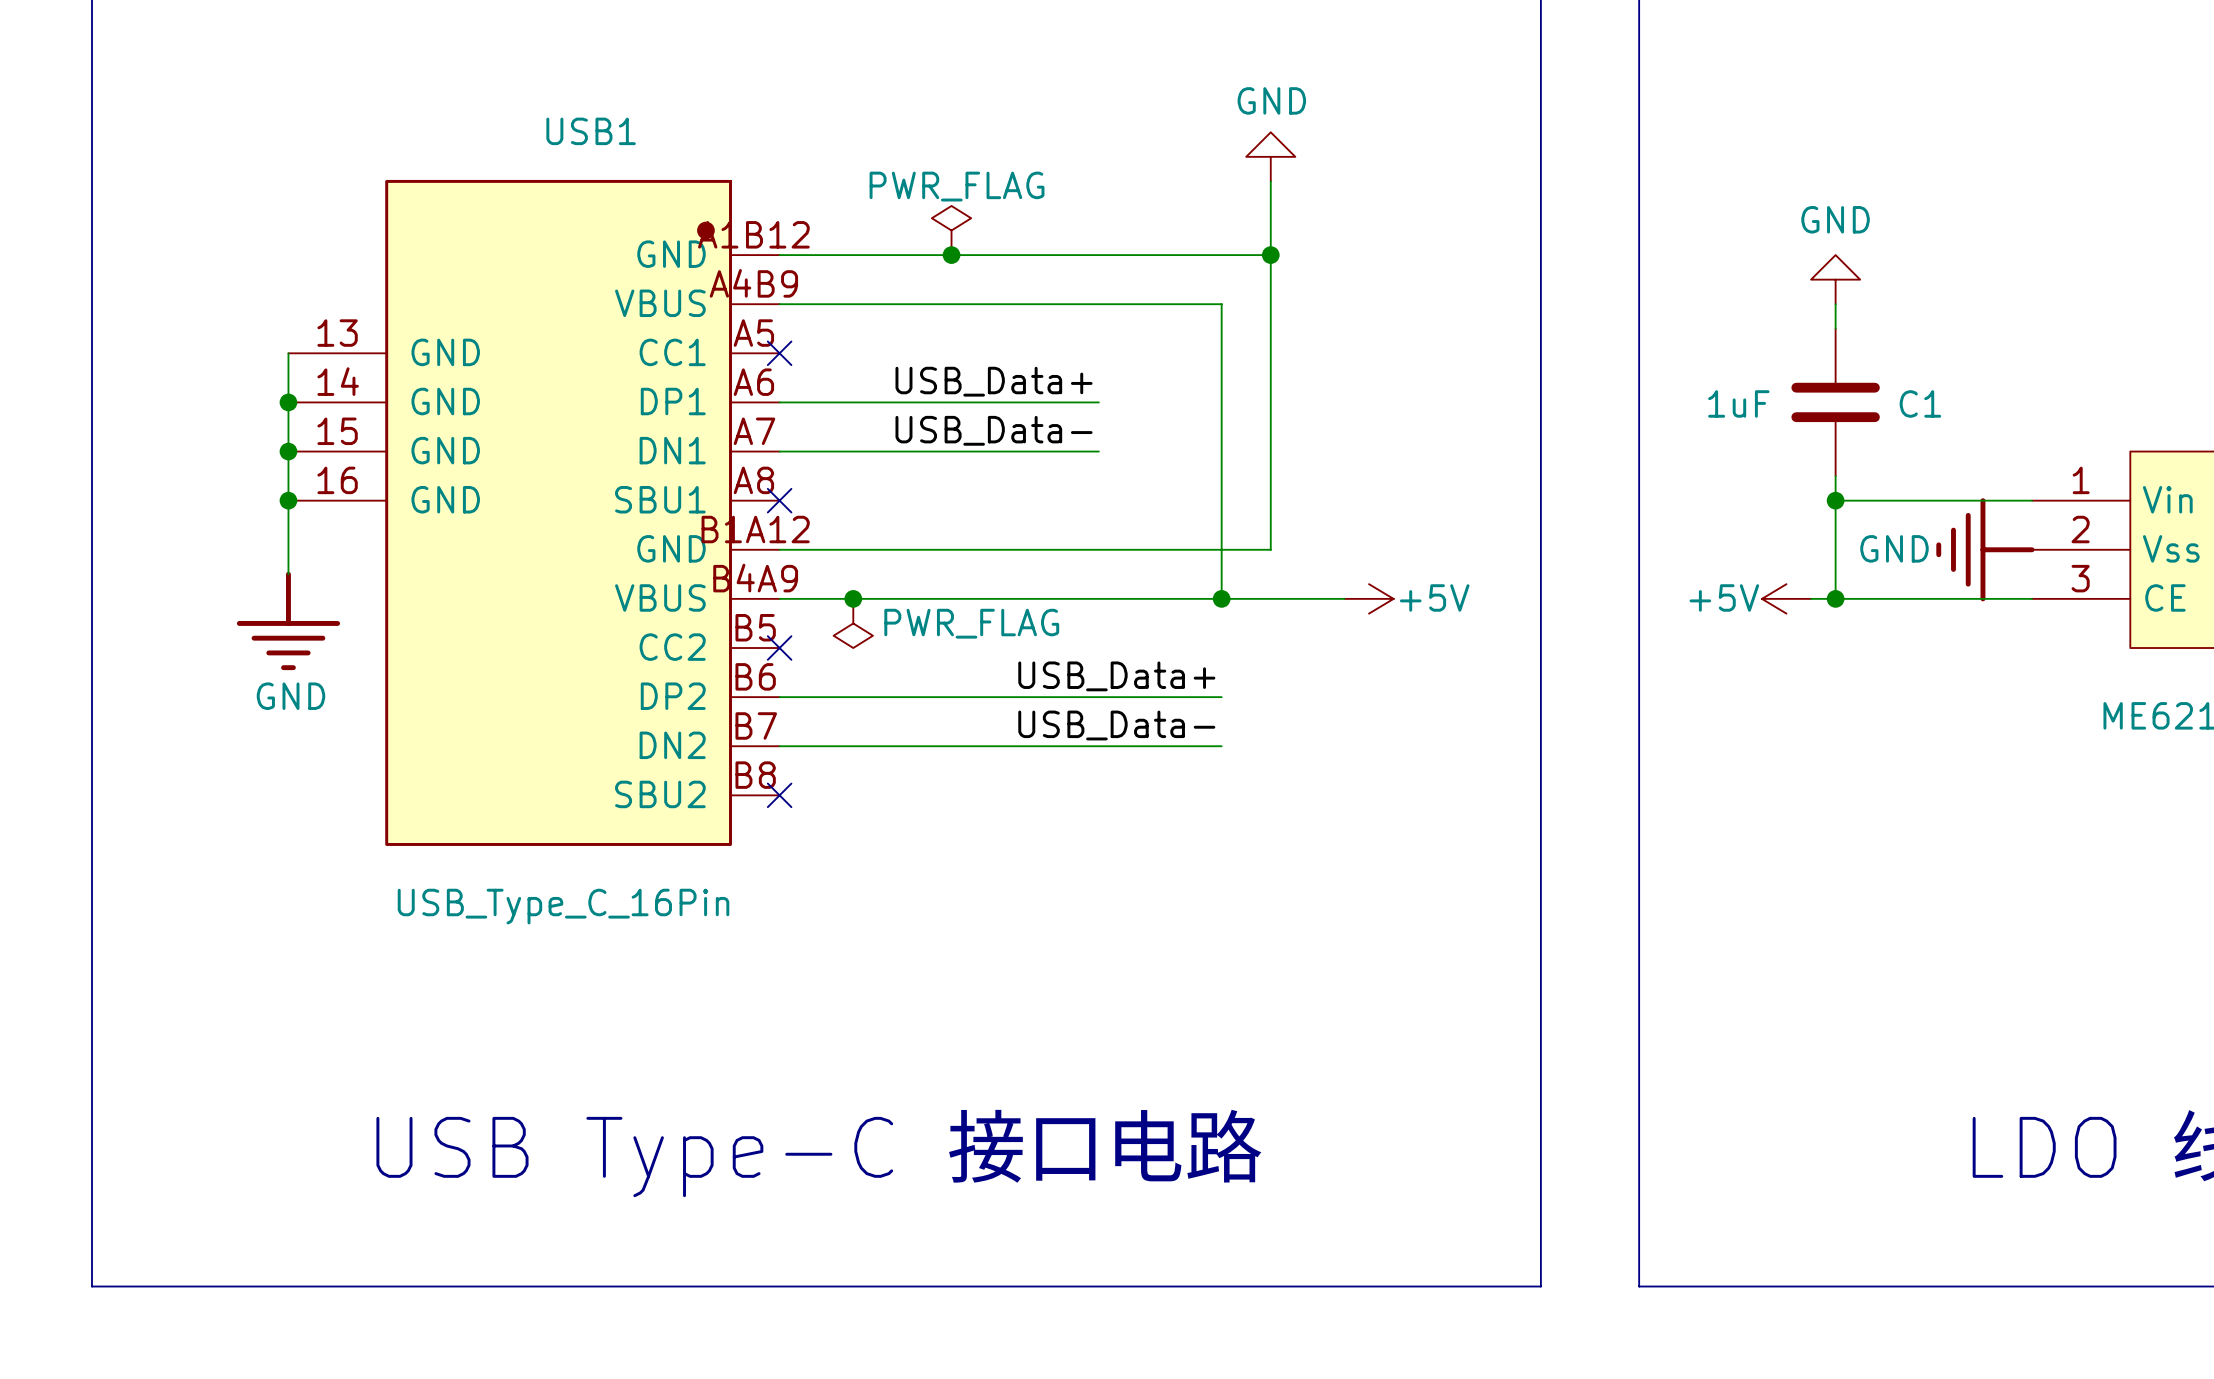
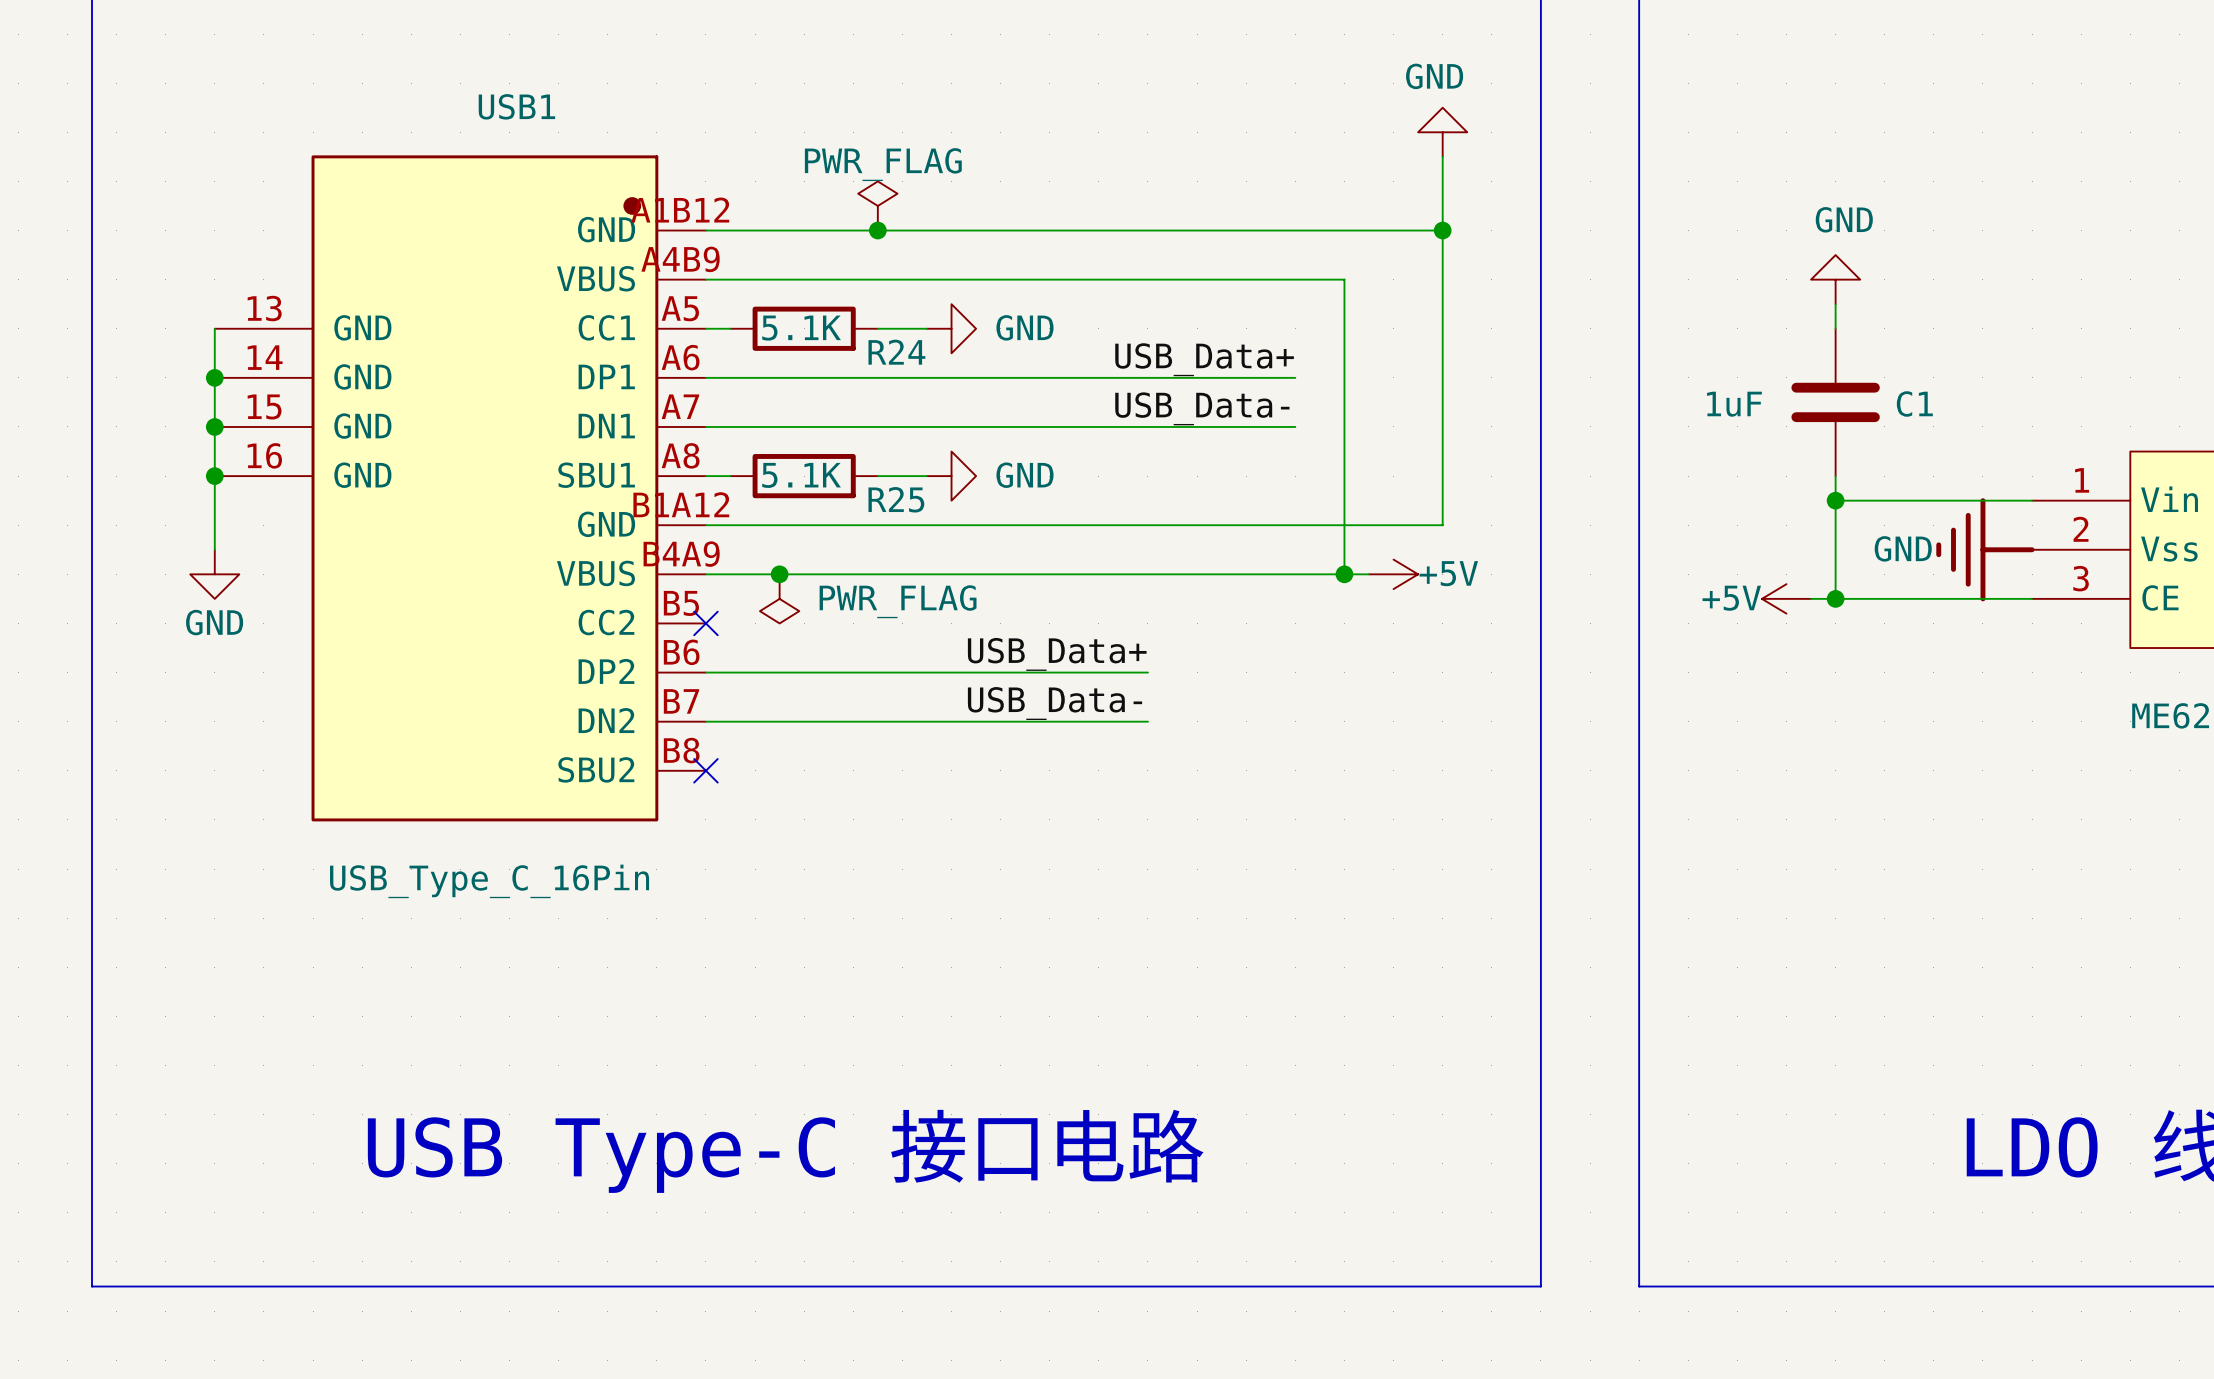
power symbol position: GND (1270, 156) -> GND (1442, 132)
wire: none -> (1442, 156) (1442, 525) (705, 525)
wire: (1270, 181) (1270, 549) (779, 549) -> none
wire: none -> (705, 230) (1442, 230)
power symbol position: PWR_FLAG (951, 230) -> PWR_FLAG (877, 205)
junction: none -> (1442, 230)
wire: (779, 255) (1270, 255) -> none
junction position: (951, 255) -> (877, 230)
junction: (1270, 255) -> none
wire: none -> (705, 279) (1344, 279) (1344, 574)
wire: (779, 304) (1221, 304) (1221, 598) -> none
R24: none -> 5.1K (804, 328)
wire: none -> (877, 328) (926, 328)
power symbol: none -> GND (951, 328)
wire: (288, 353) (288, 574) -> (214, 328) (214, 549)
no-connect mark: (779, 353) -> none
label: none -> USB_Data+ (1204, 359)
junction: none -> (214, 377)
wire: none -> (705, 377) (1295, 377)
label: USB_Data+ (994, 381) -> none
junction: (288, 402) -> none
wire: (779, 402) (1098, 402) -> none
label: none -> USB_Data- (1202, 408)
junction: none -> (214, 426)
wire: none -> (705, 426) (1295, 426)
label: USB_Data- (994, 430) -> none
junction: (288, 451) -> none
wire: (779, 451) (1098, 451) -> none
junction: none -> (214, 476)
R25: none -> 5.1K (804, 476)
wire: none -> (877, 476) (926, 476)
power symbol: none -> GND (951, 476)
junction: (288, 500) -> none
no-connect mark: (779, 500) -> none
USB1 position: (534, 512) -> (460, 488)
power symbol: none -> GND (214, 574)
wire: none -> (705, 574) (1369, 574)
junction: none -> (1344, 574)
wire: (779, 598) (1344, 598) -> none
junction position: (853, 598) -> (779, 574)
junction: (1221, 598) -> none
power symbol position: +5V (1369, 598) -> +5V (1393, 574)
power symbol: GND (288, 620) -> none
no-connect mark: none -> (705, 623)
power symbol position: PWR_FLAG (853, 623) -> PWR_FLAG (779, 598)
no-connect mark: (779, 648) -> none
label position: USB_Data+ (1116, 676) -> USB_Data+ (1057, 654)
wire: (779, 697) (1221, 697) -> (705, 672) (1147, 672)
label position: USB_Data- (1116, 725) -> USB_Data- (1055, 703)
wire: (779, 746) (1221, 746) -> (705, 721) (1147, 721)
no-connect mark: none -> (705, 770)
no-connect mark: (779, 795) -> none

